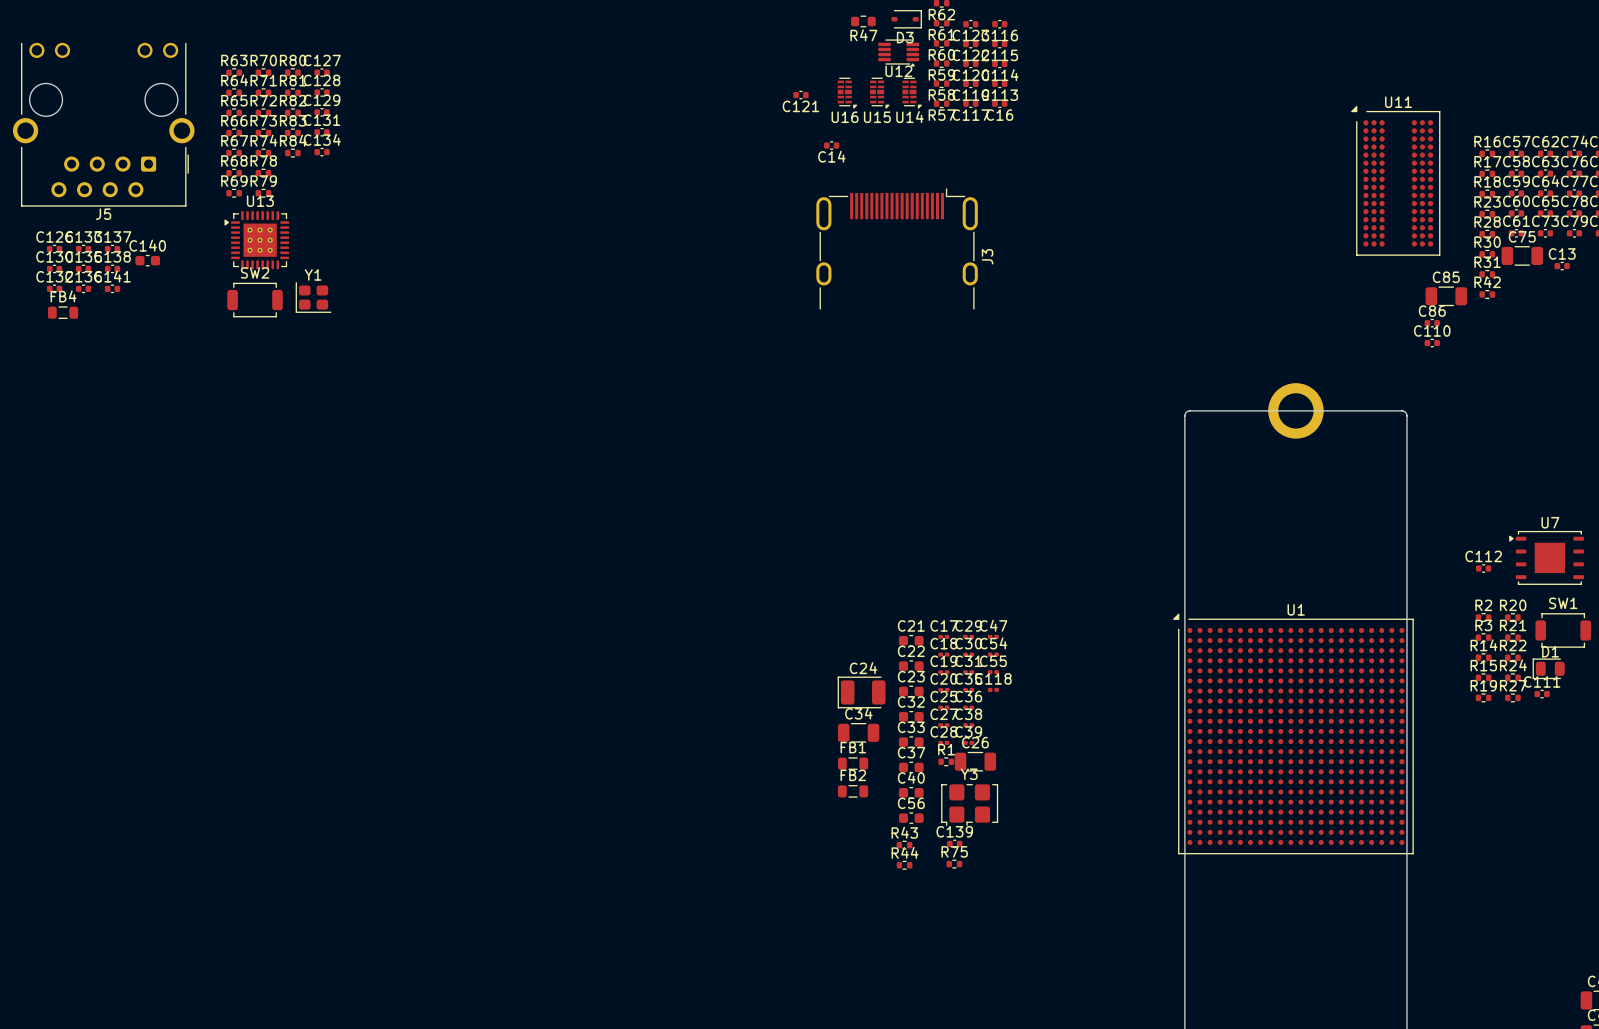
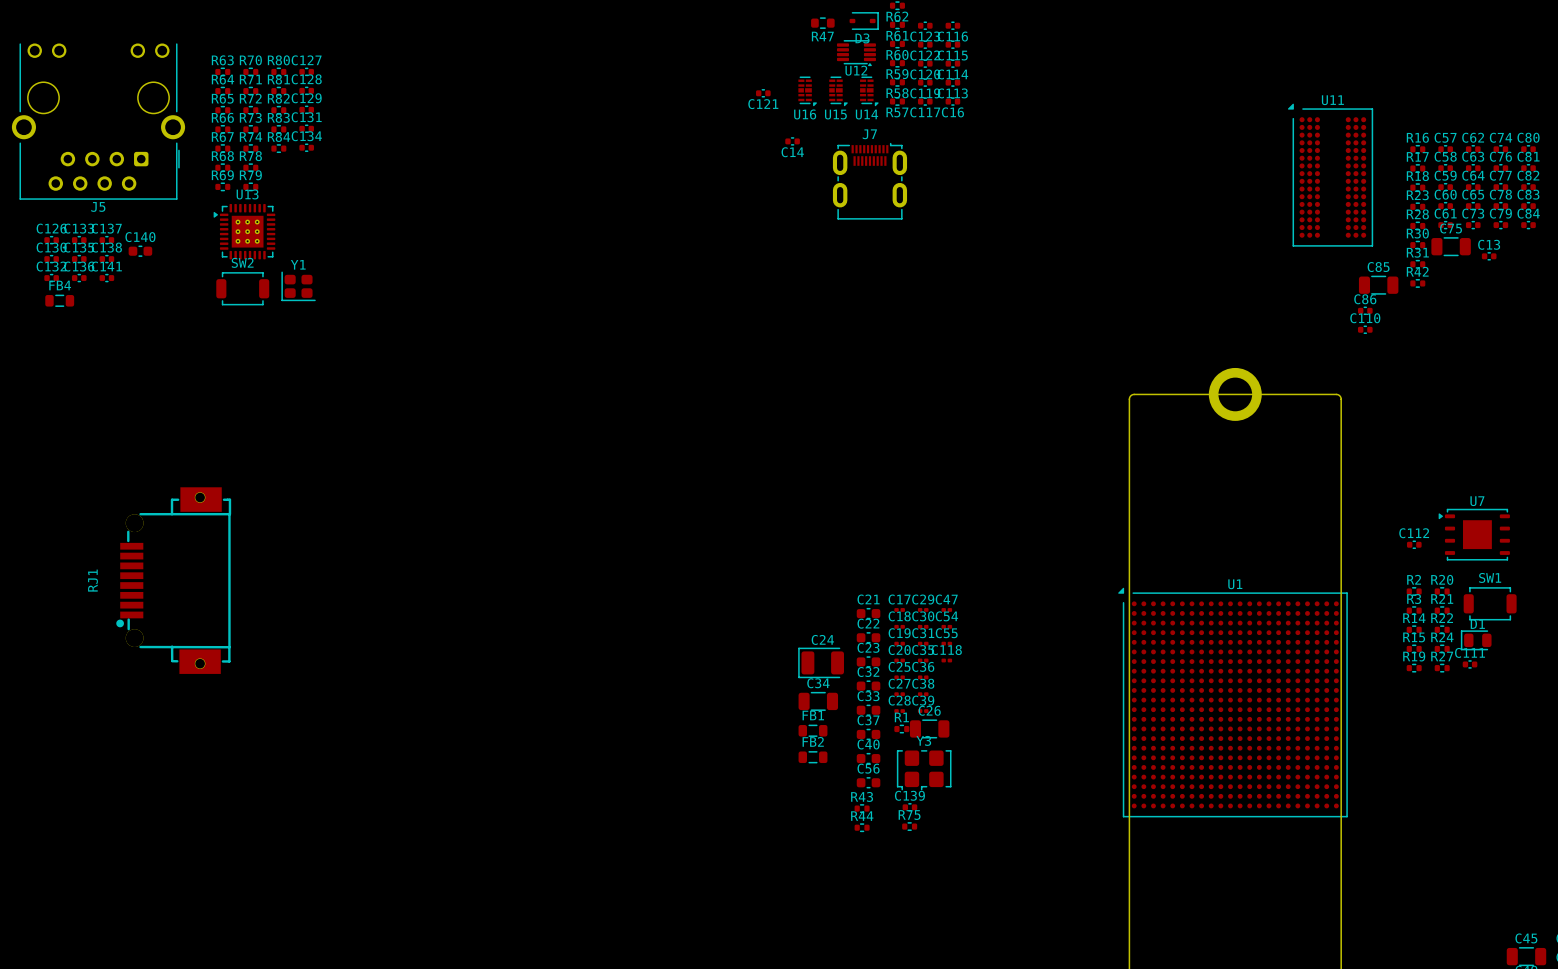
J7: none -> (869, 181)
J3: (897, 248) -> none
RJ1: none -> (173, 580)

